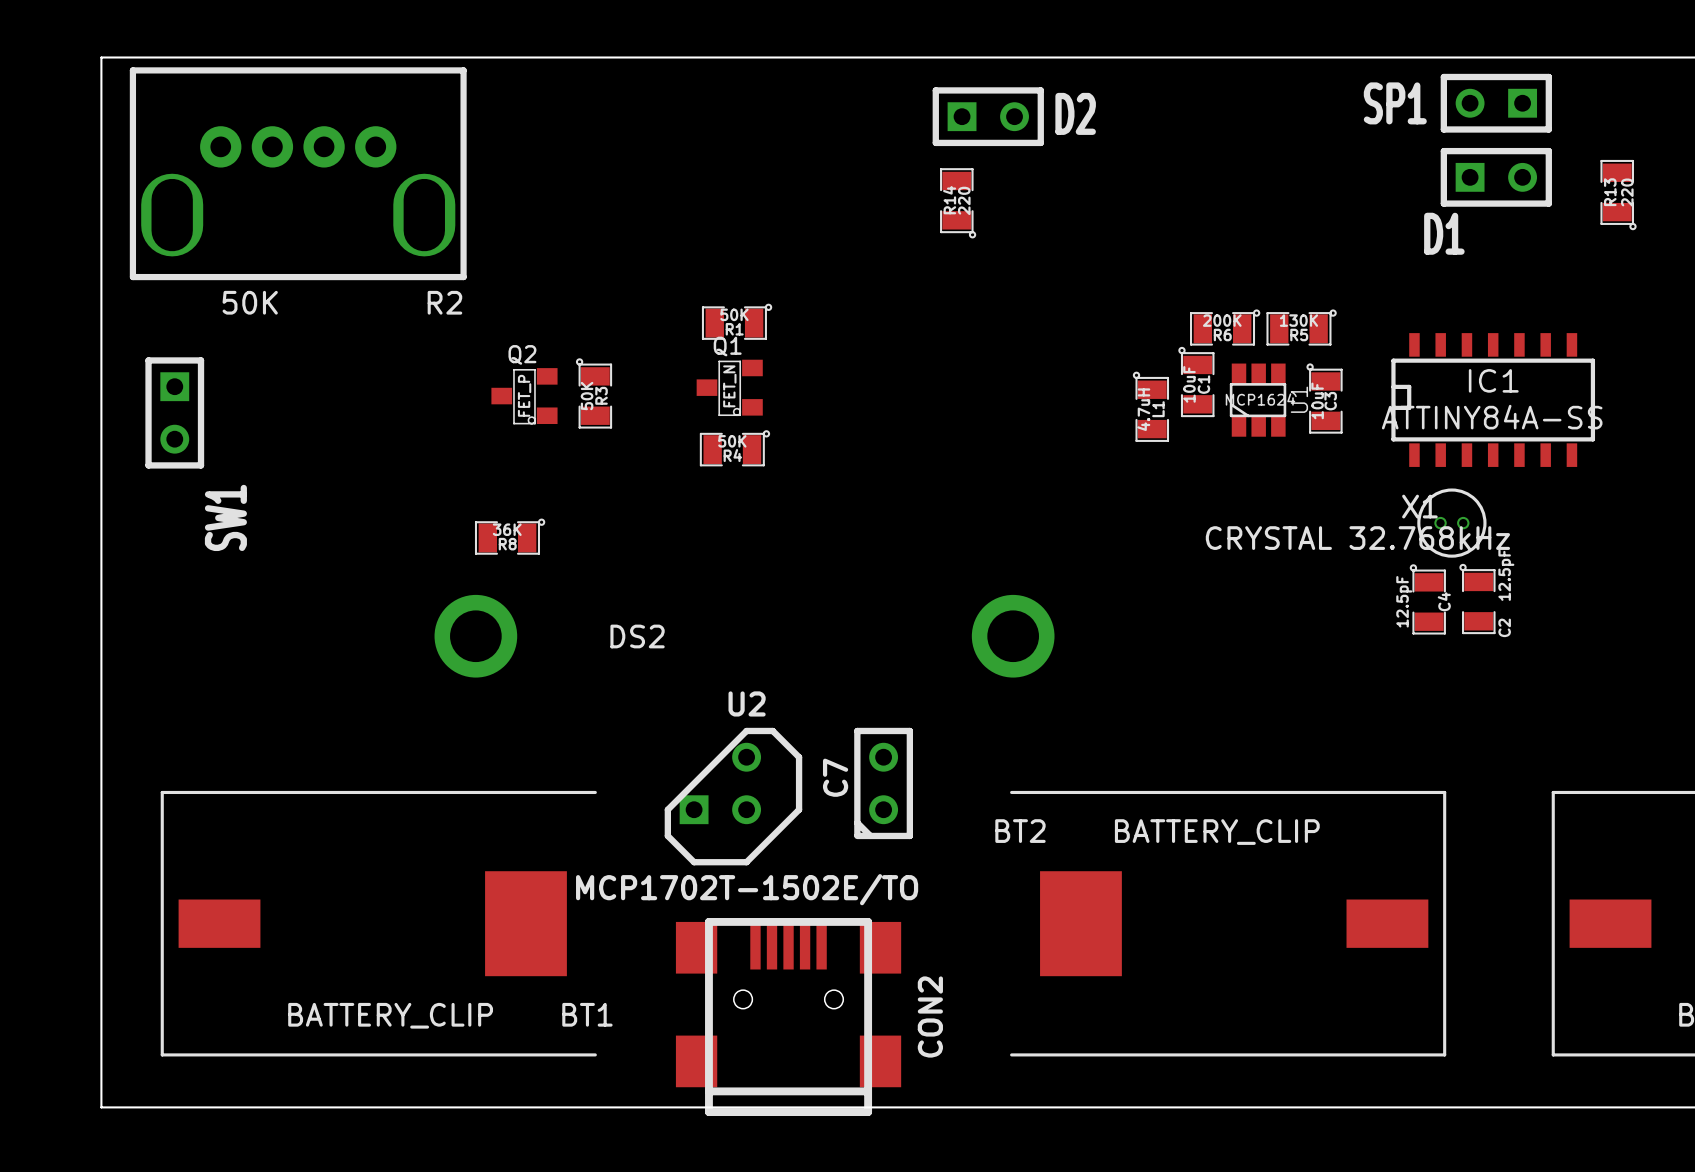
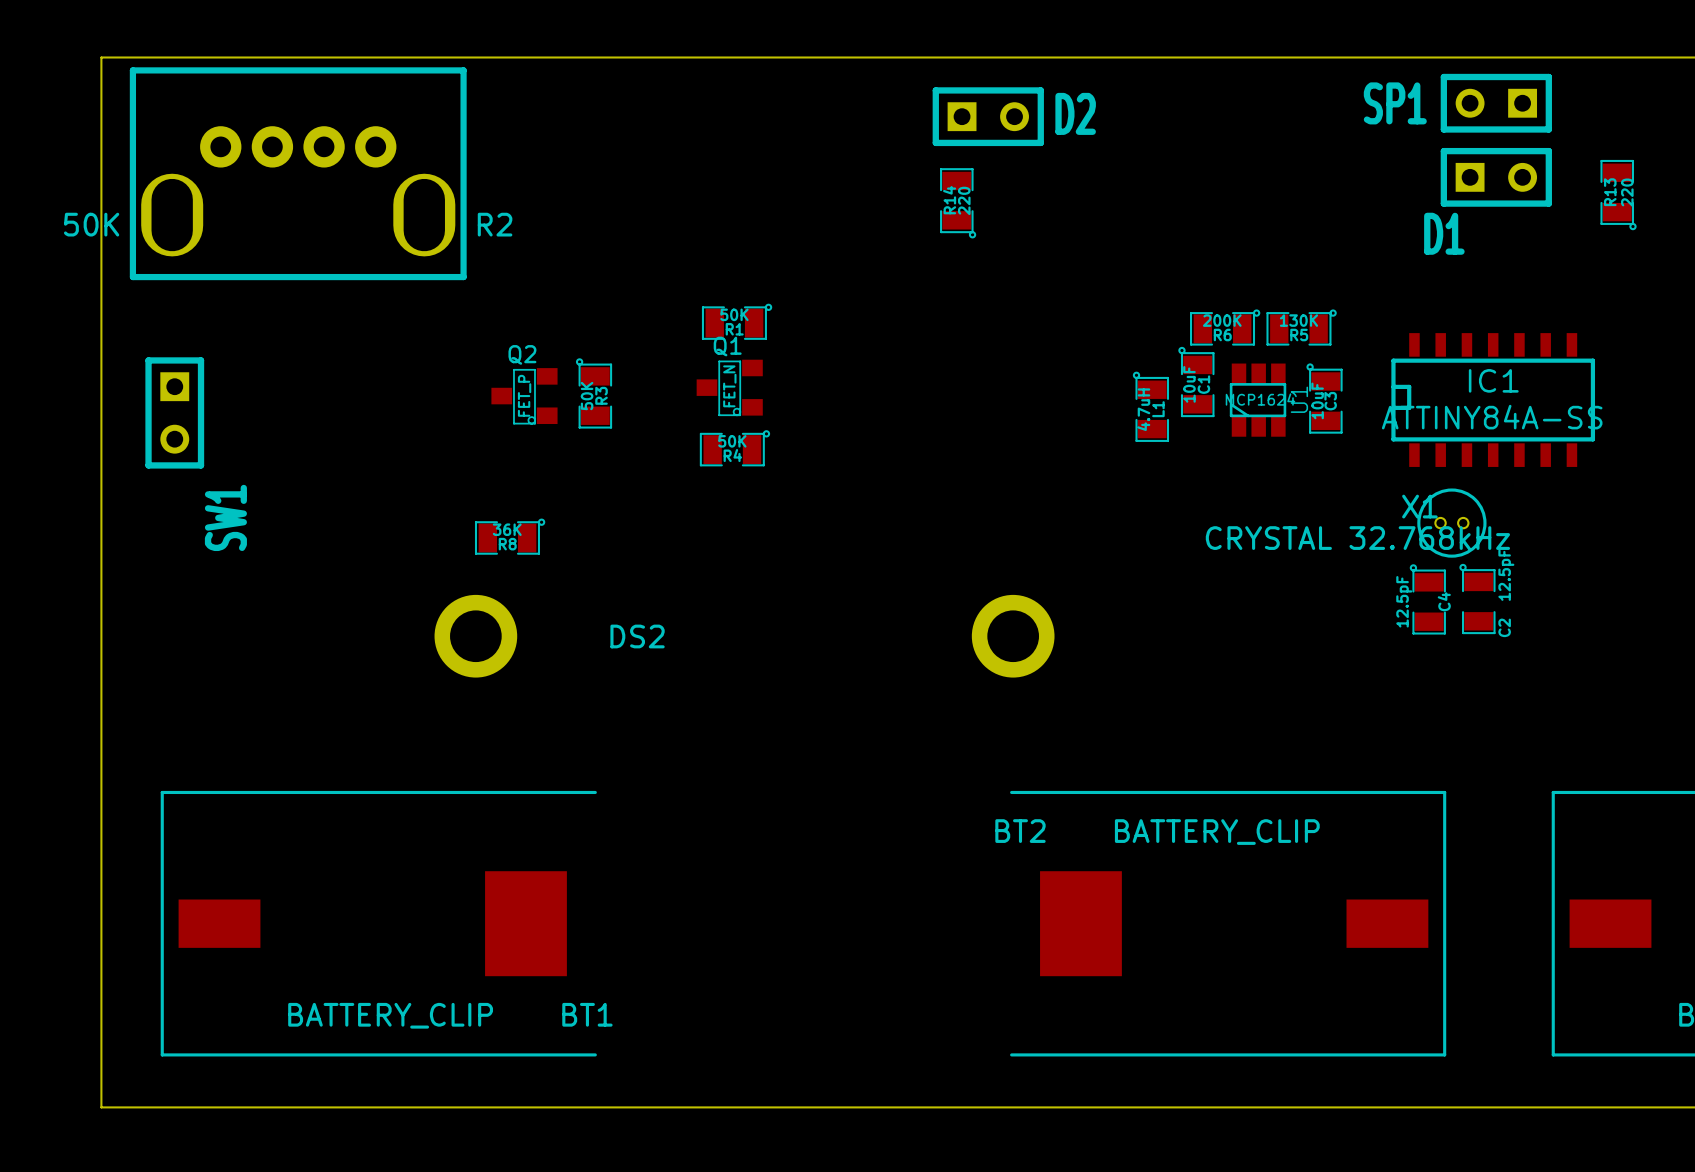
R2 value position: 50K (250, 302) -> 50K (91, 224)
R2 name position: R2 (444, 302) -> R2 (495, 224)
C7: (883, 783) -> none
U2: MCP1702T-1502E/TO (733, 796) -> none
CON2: (788, 1016) -> none

